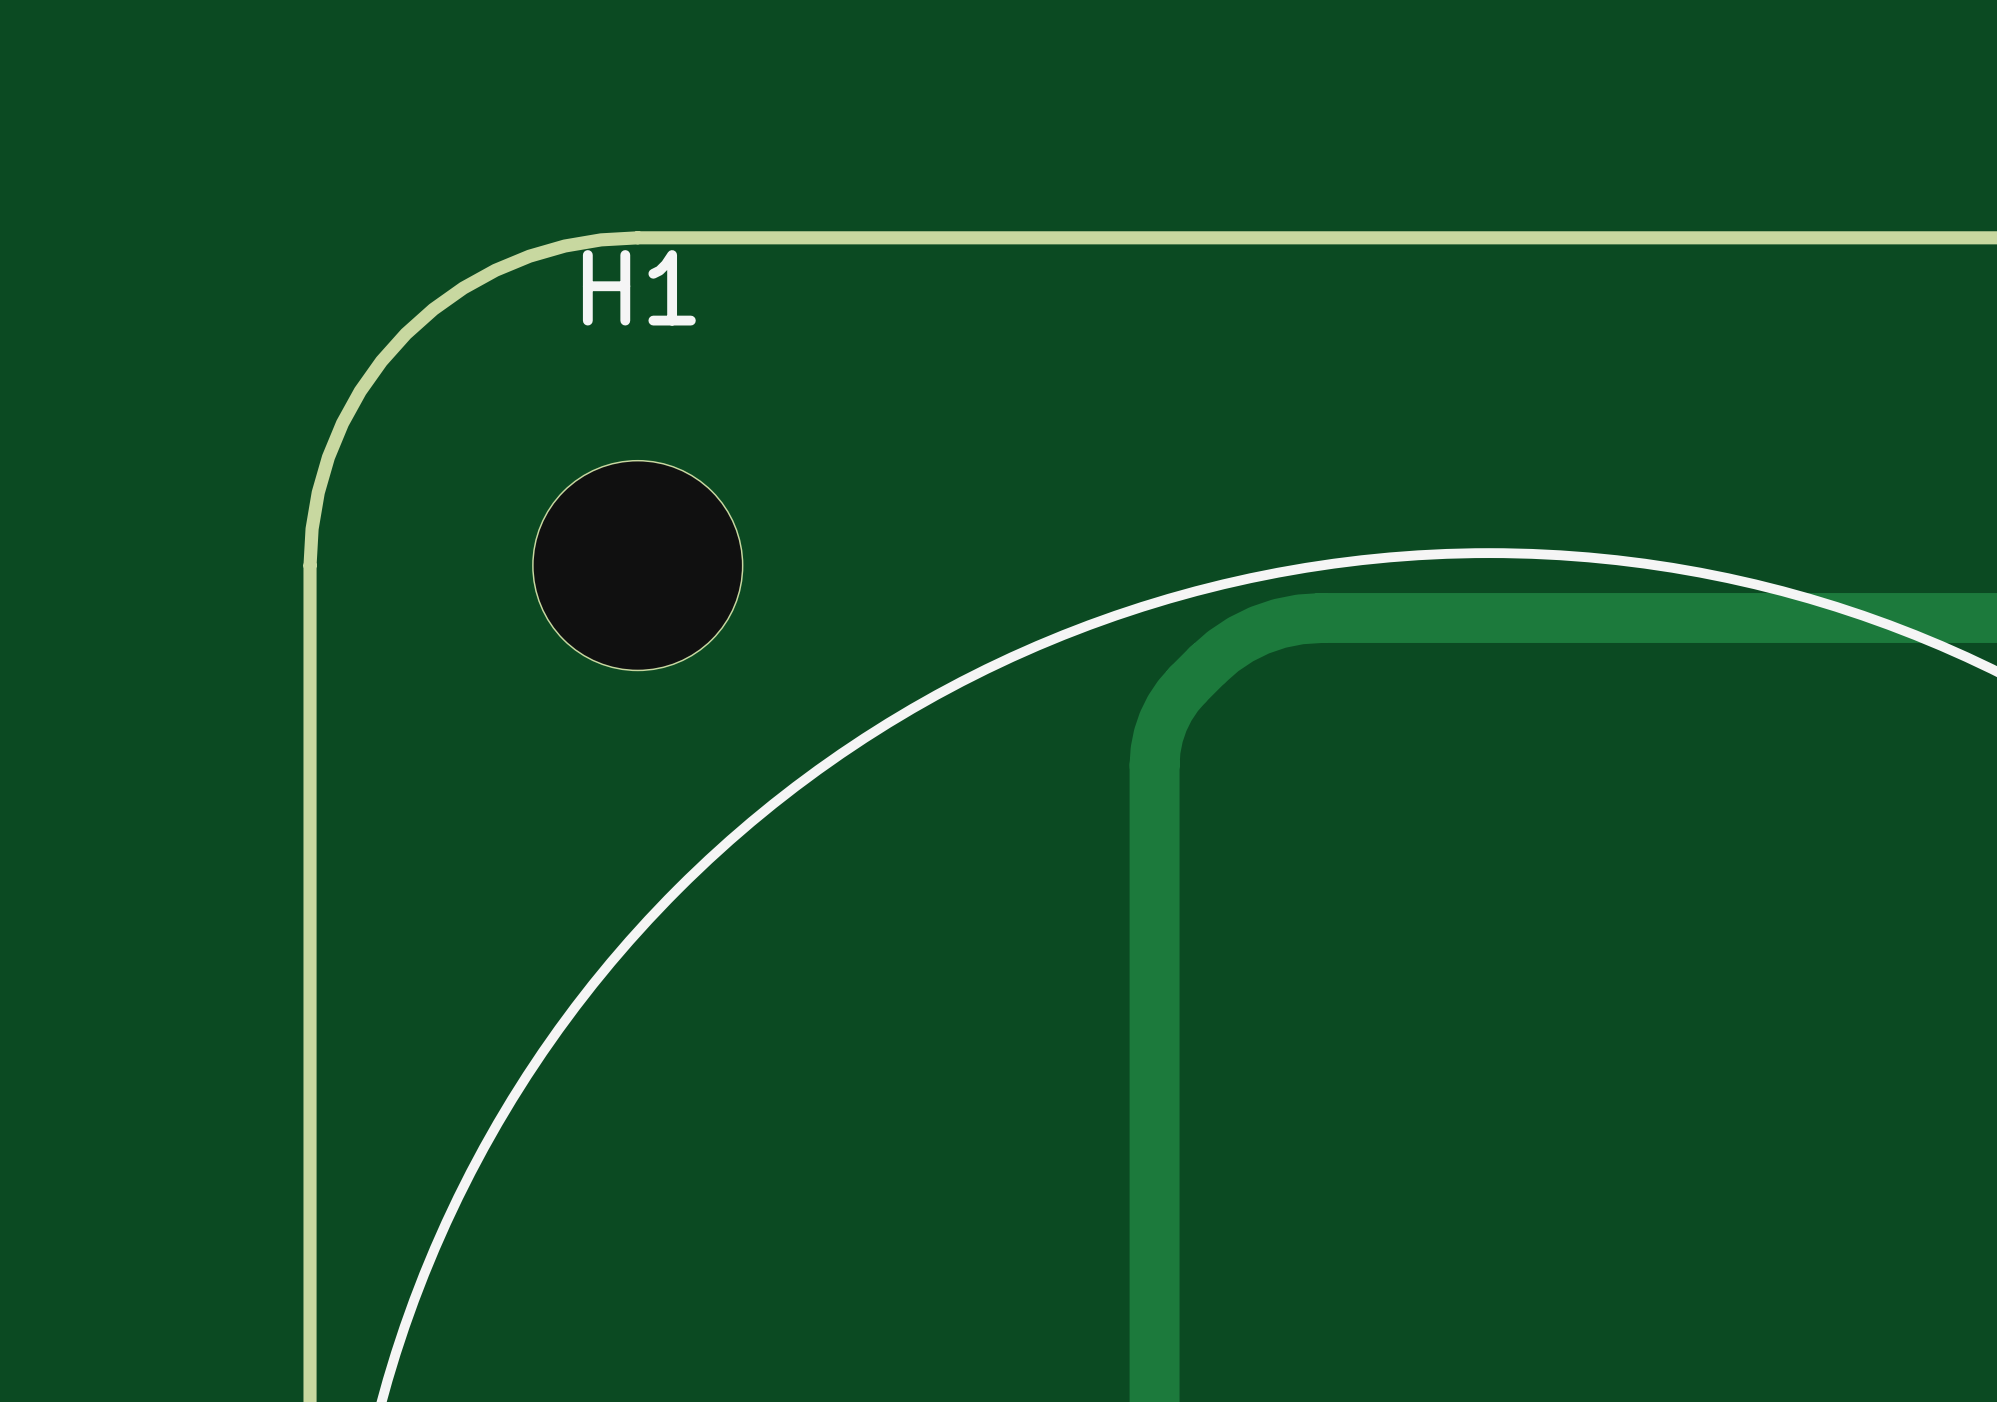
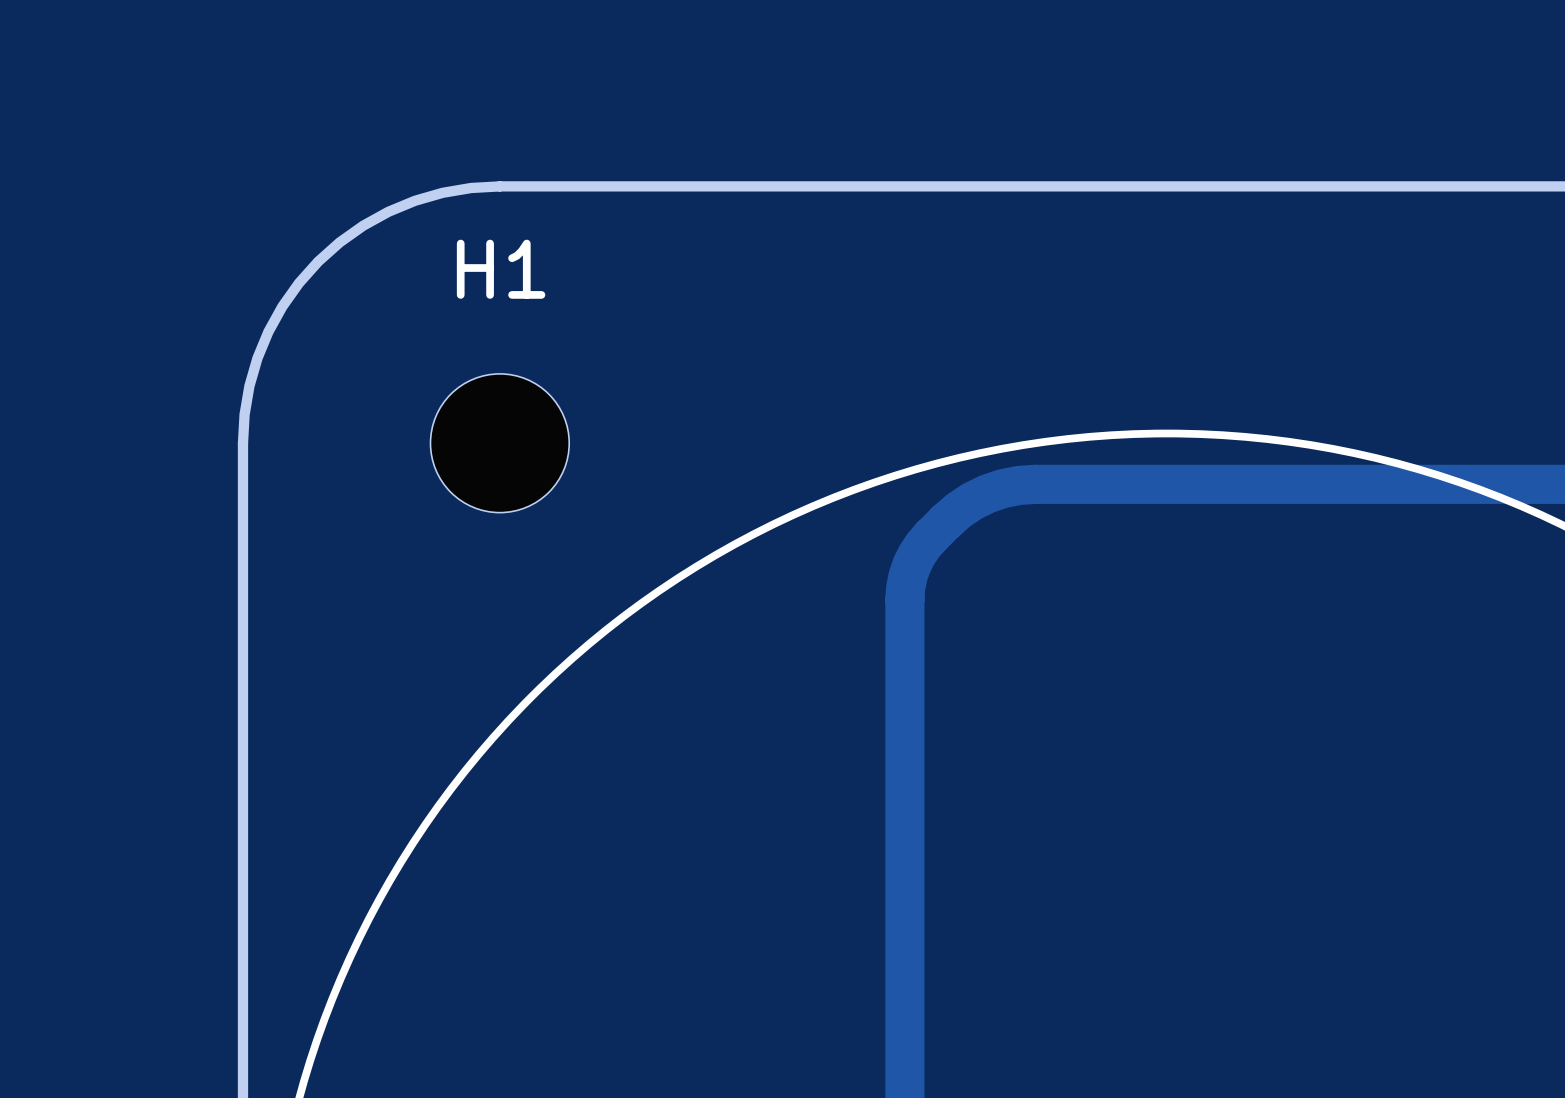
H1 name position: H1 (639, 287) -> H1 (501, 269)
H1 footprint: [532, 460, 743, 671] -> [430, 373, 570, 513]

